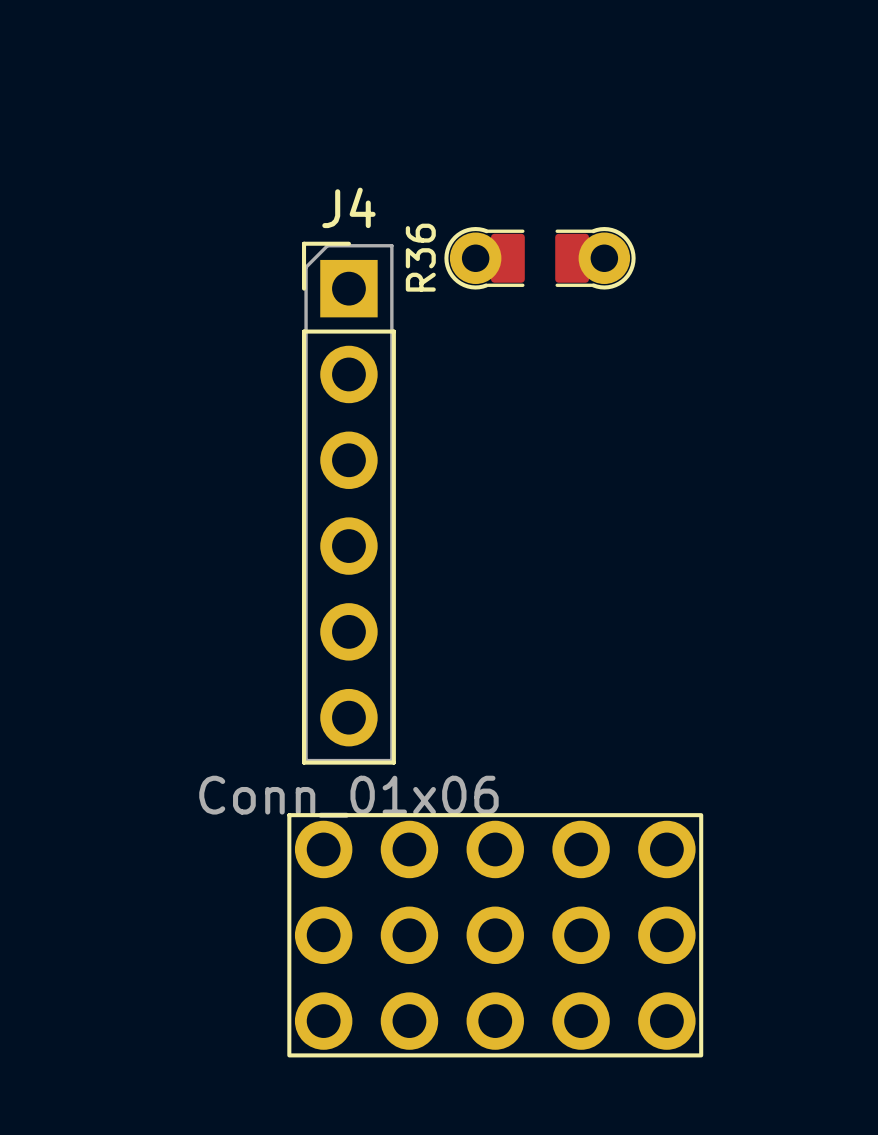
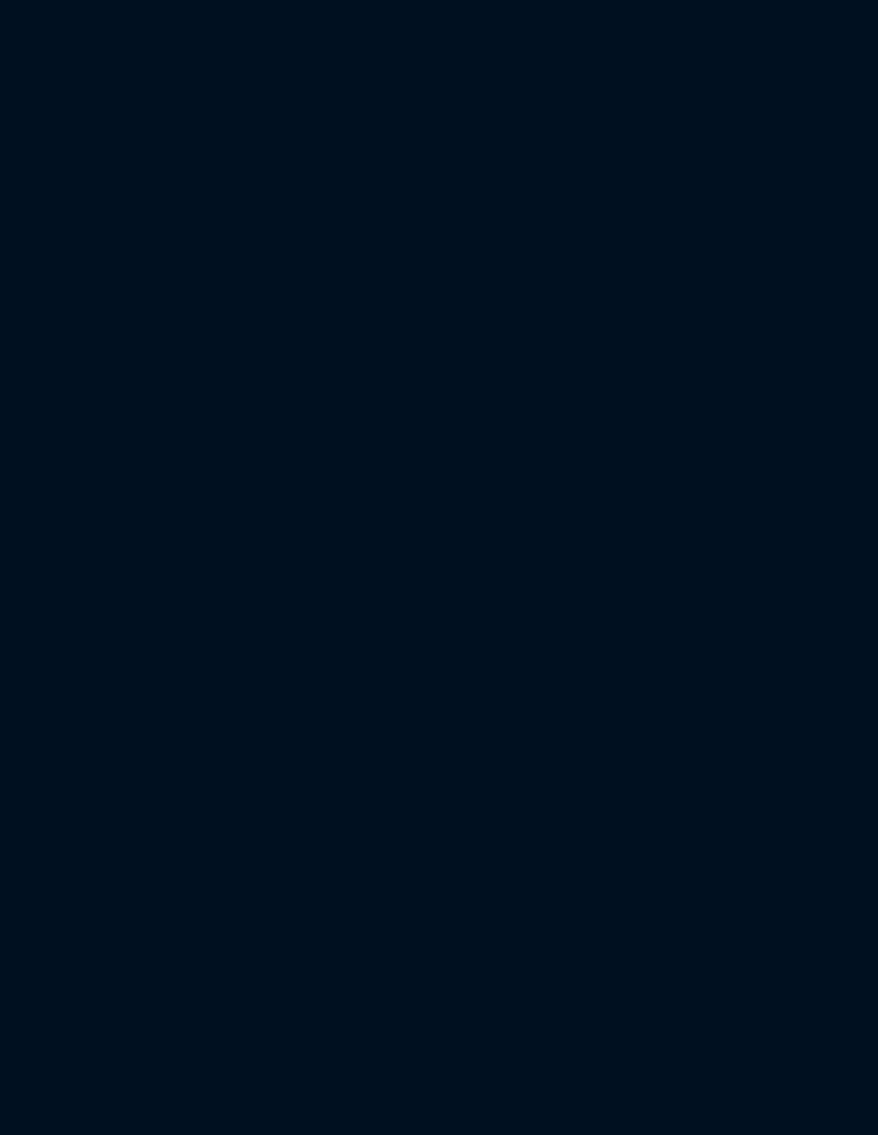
R36: (540, 258) -> none
J4: Conn_01x06 (348, 503) -> none
part: (495, 935) -> none

